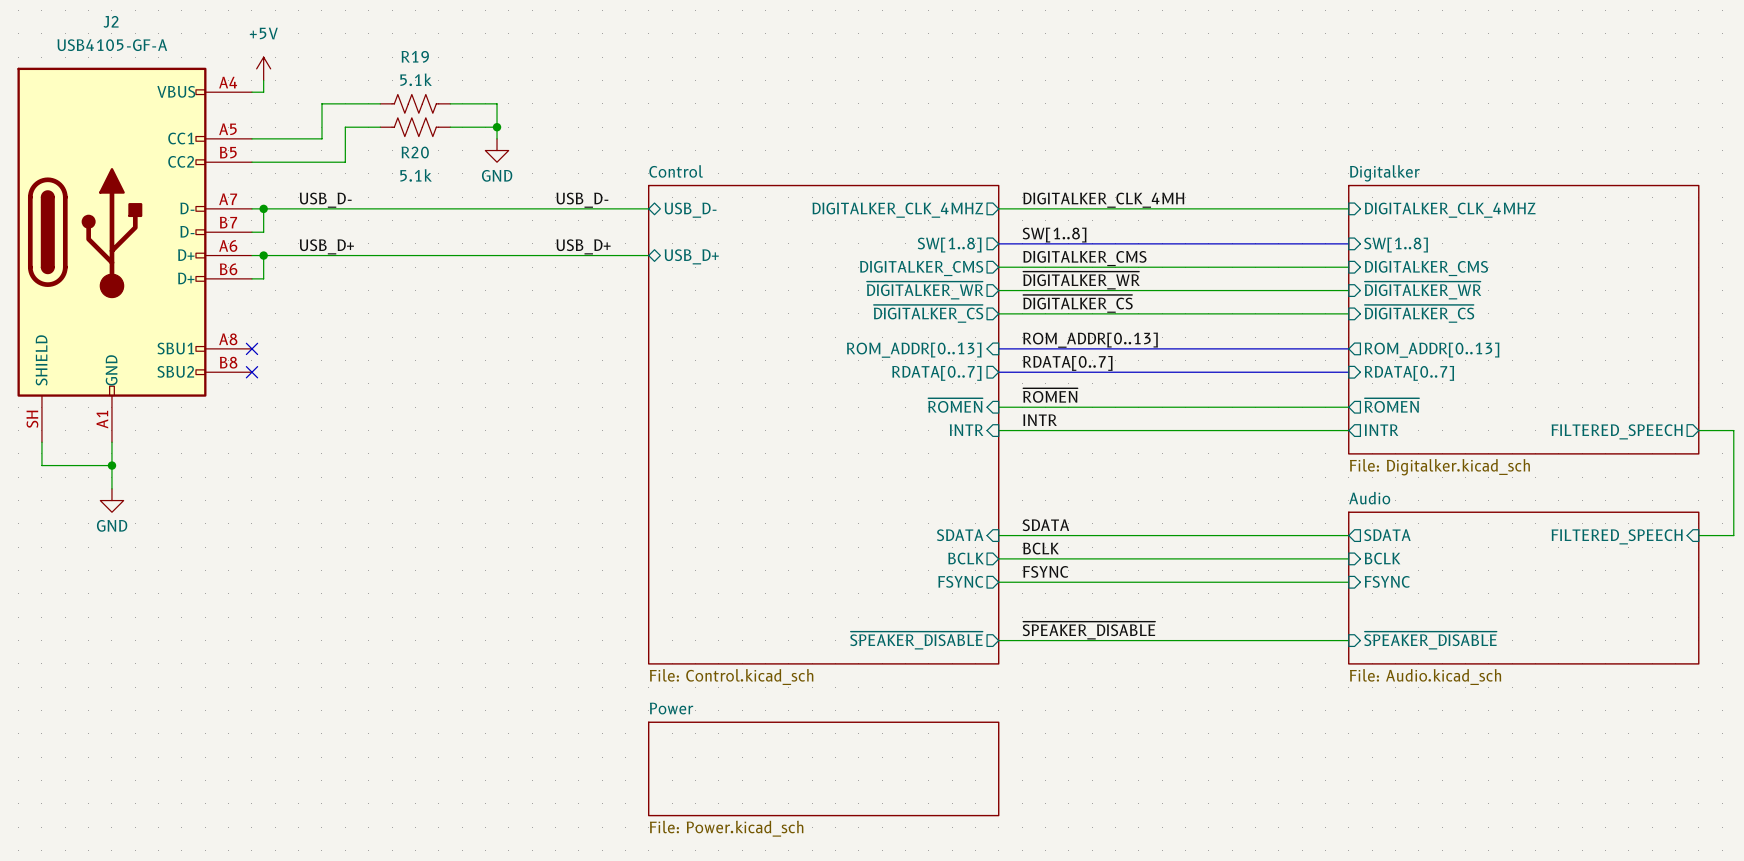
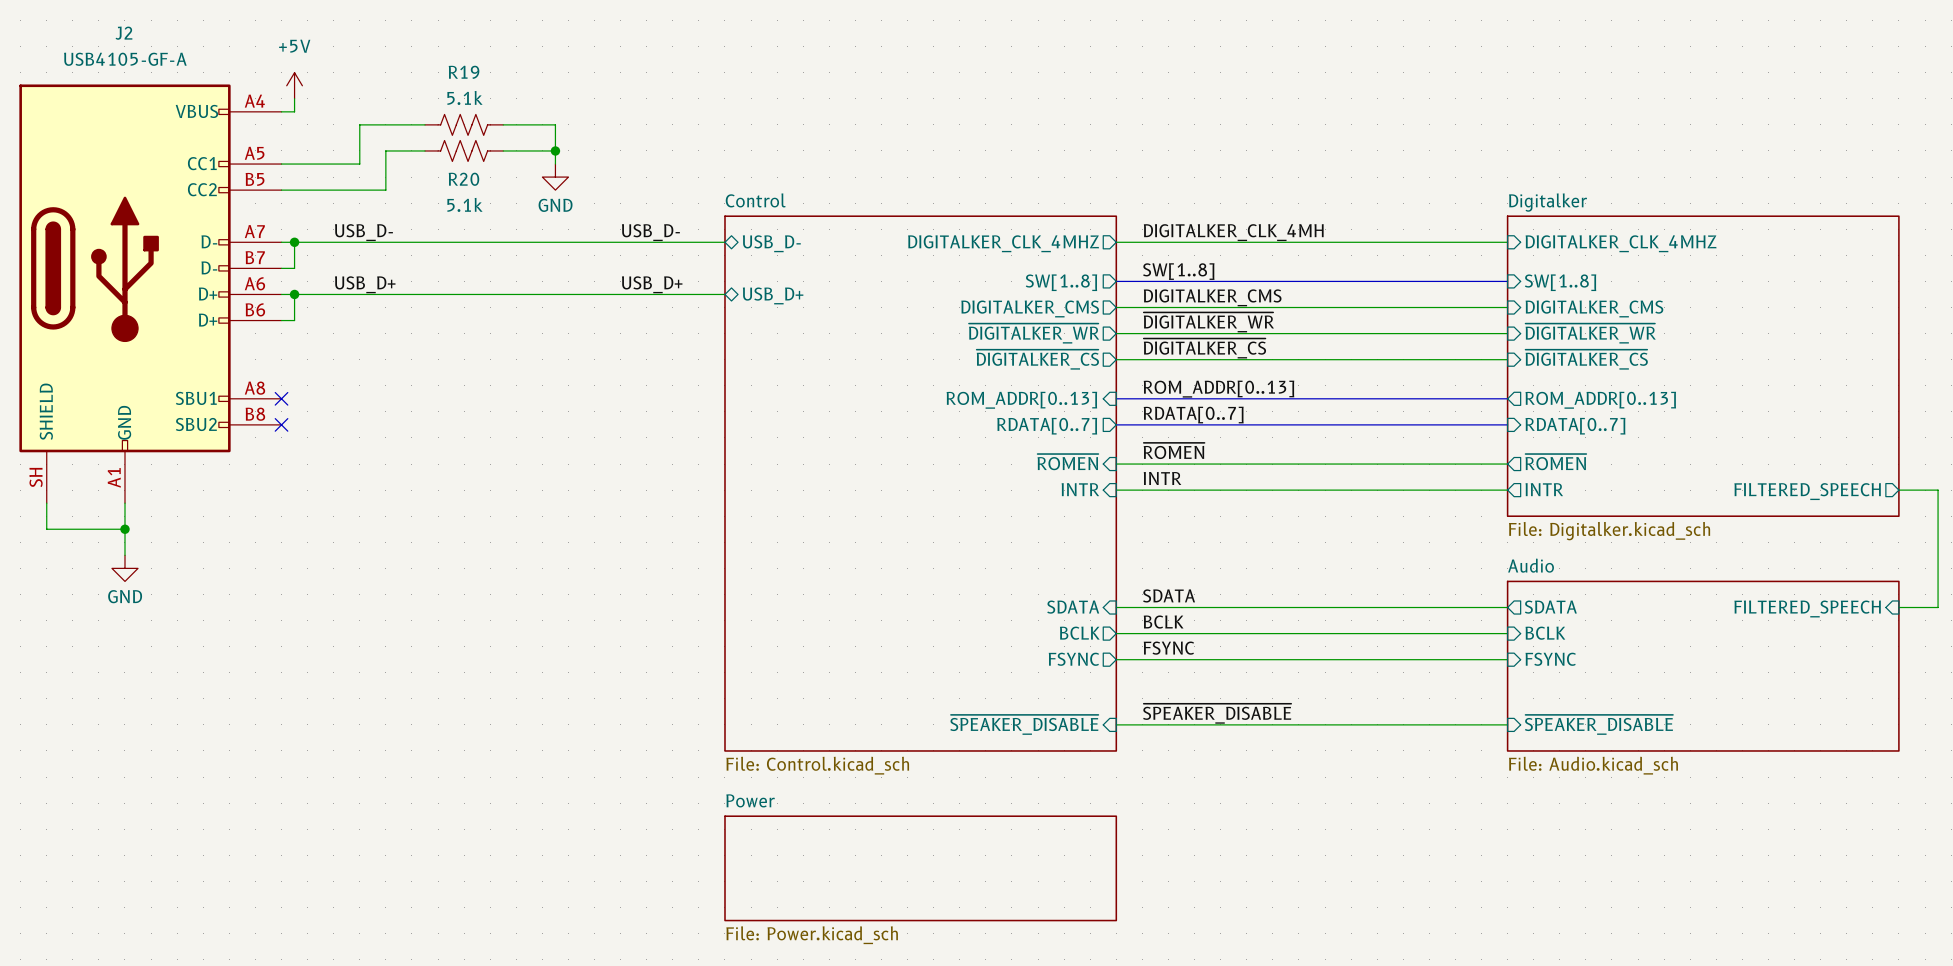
sheet pin shape: output (916, 640) -> input (1024, 724)

